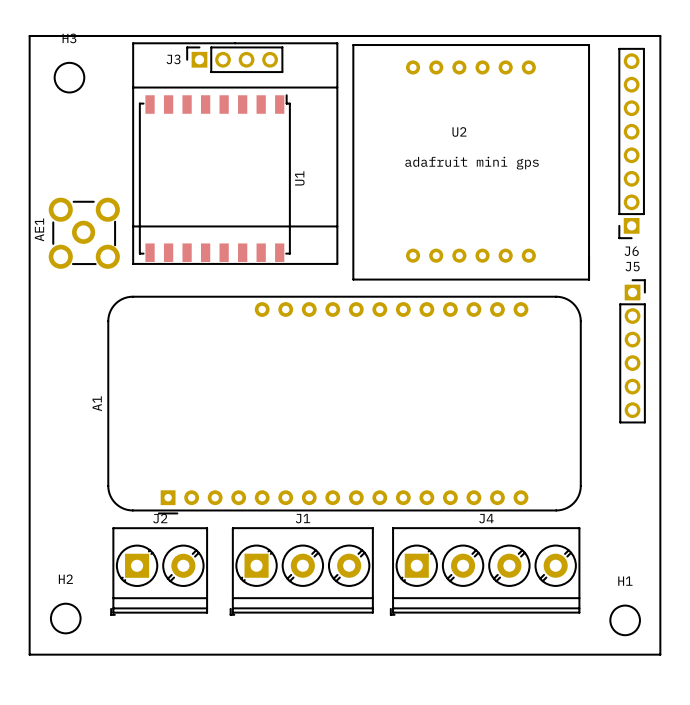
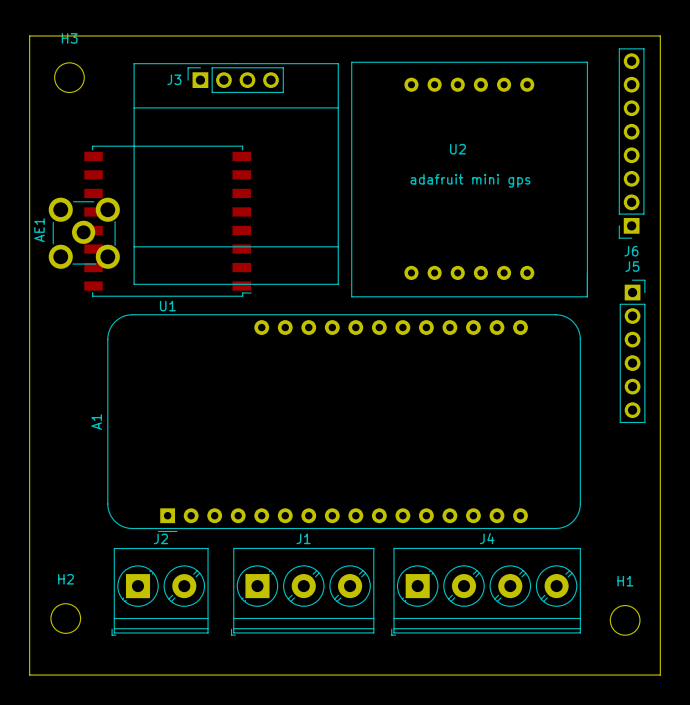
J3 position: (235, 153) -> (236, 173)
U2 position: (471, 162) -> (469, 179)
U1 rotation: 0° (214, 178) -> 90° clockwise (167, 221)
A1 position: (344, 405) -> (344, 423)
J2 position: (159, 571) -> (160, 591)
J1 position: (301, 571) -> (302, 591)
J4 position: (485, 571) -> (486, 591)
board edge: (29, 654) (660, 654) -> (29, 654) (29, 675) (660, 675) (660, 654)

